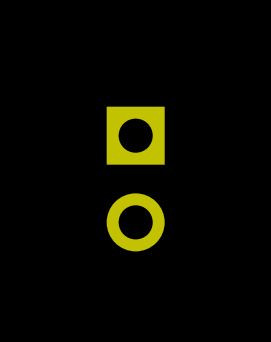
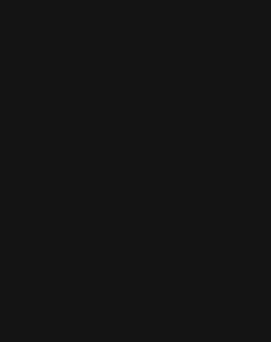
part: (135, 179) -> none

